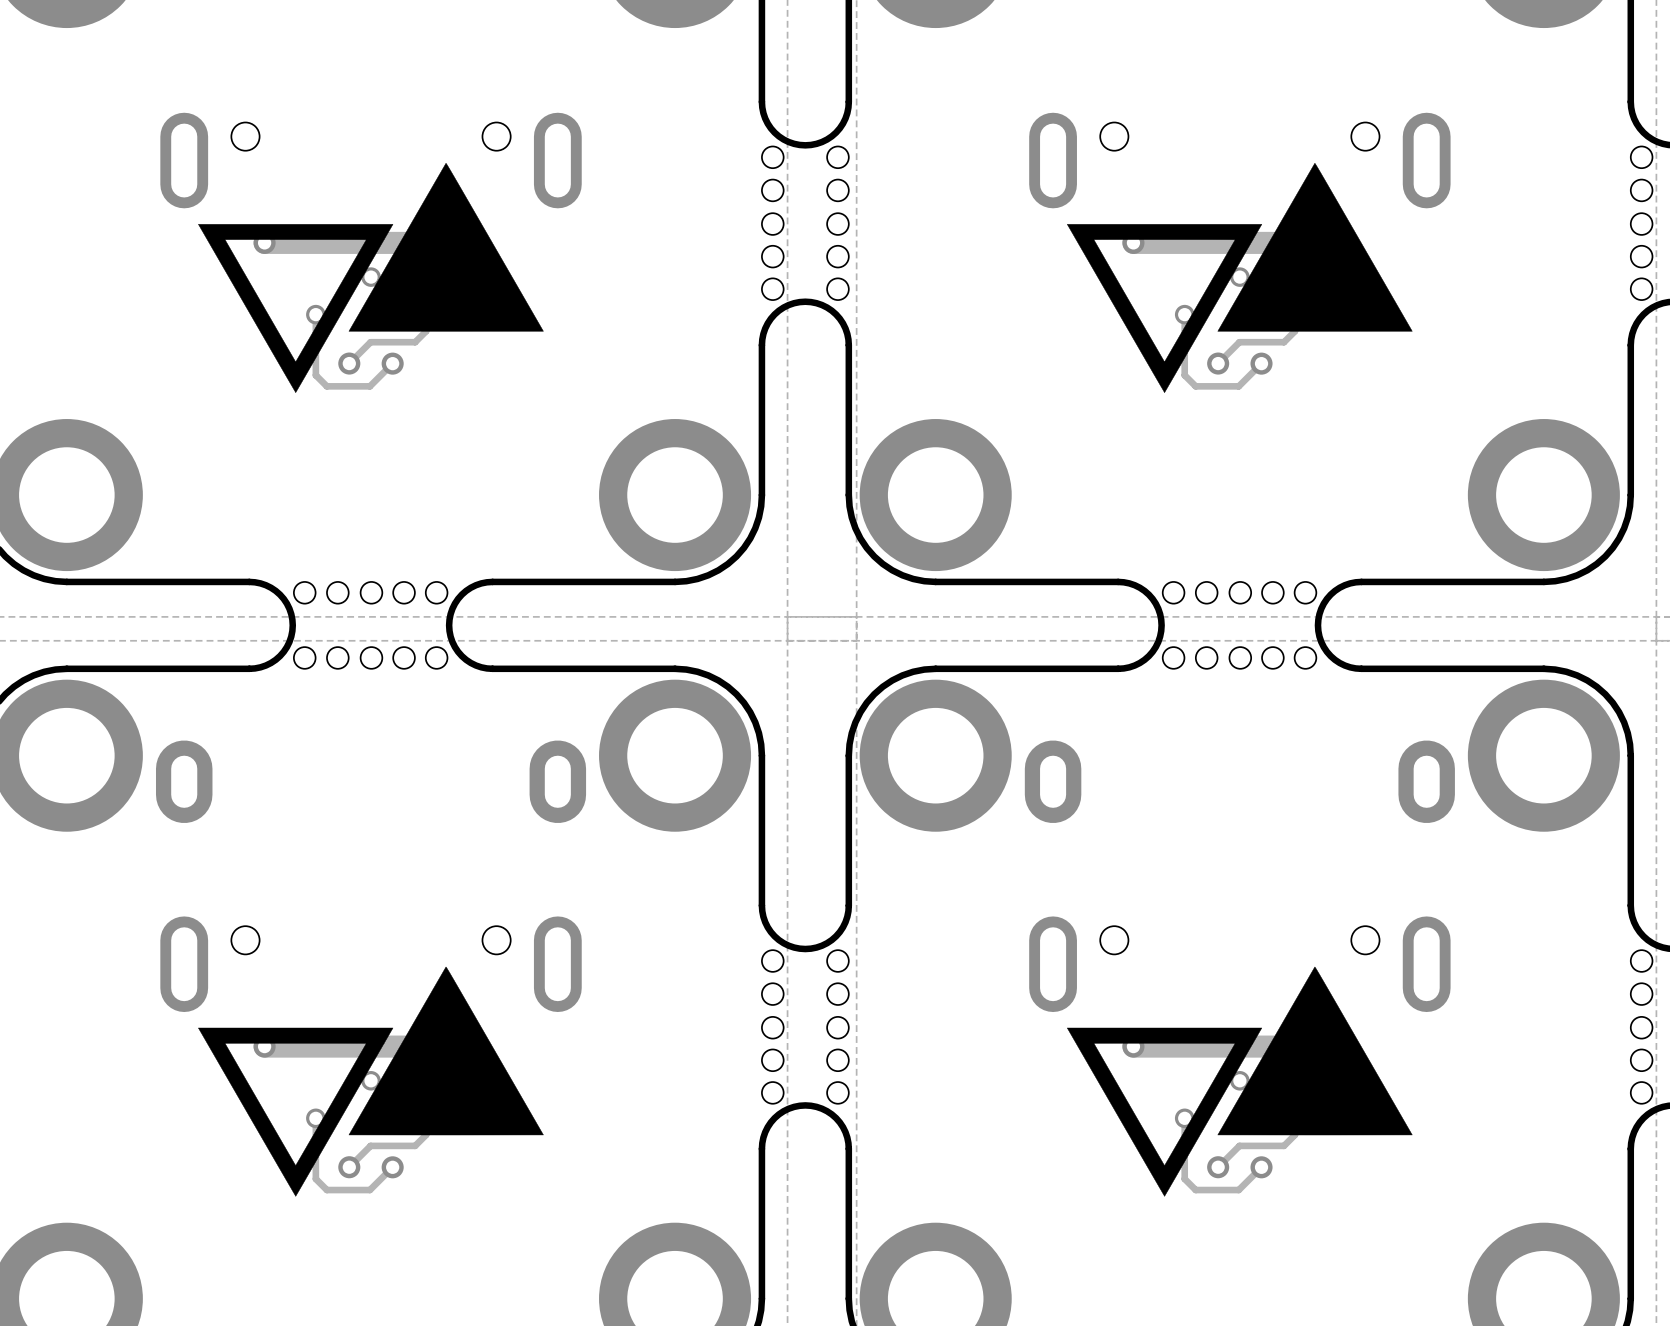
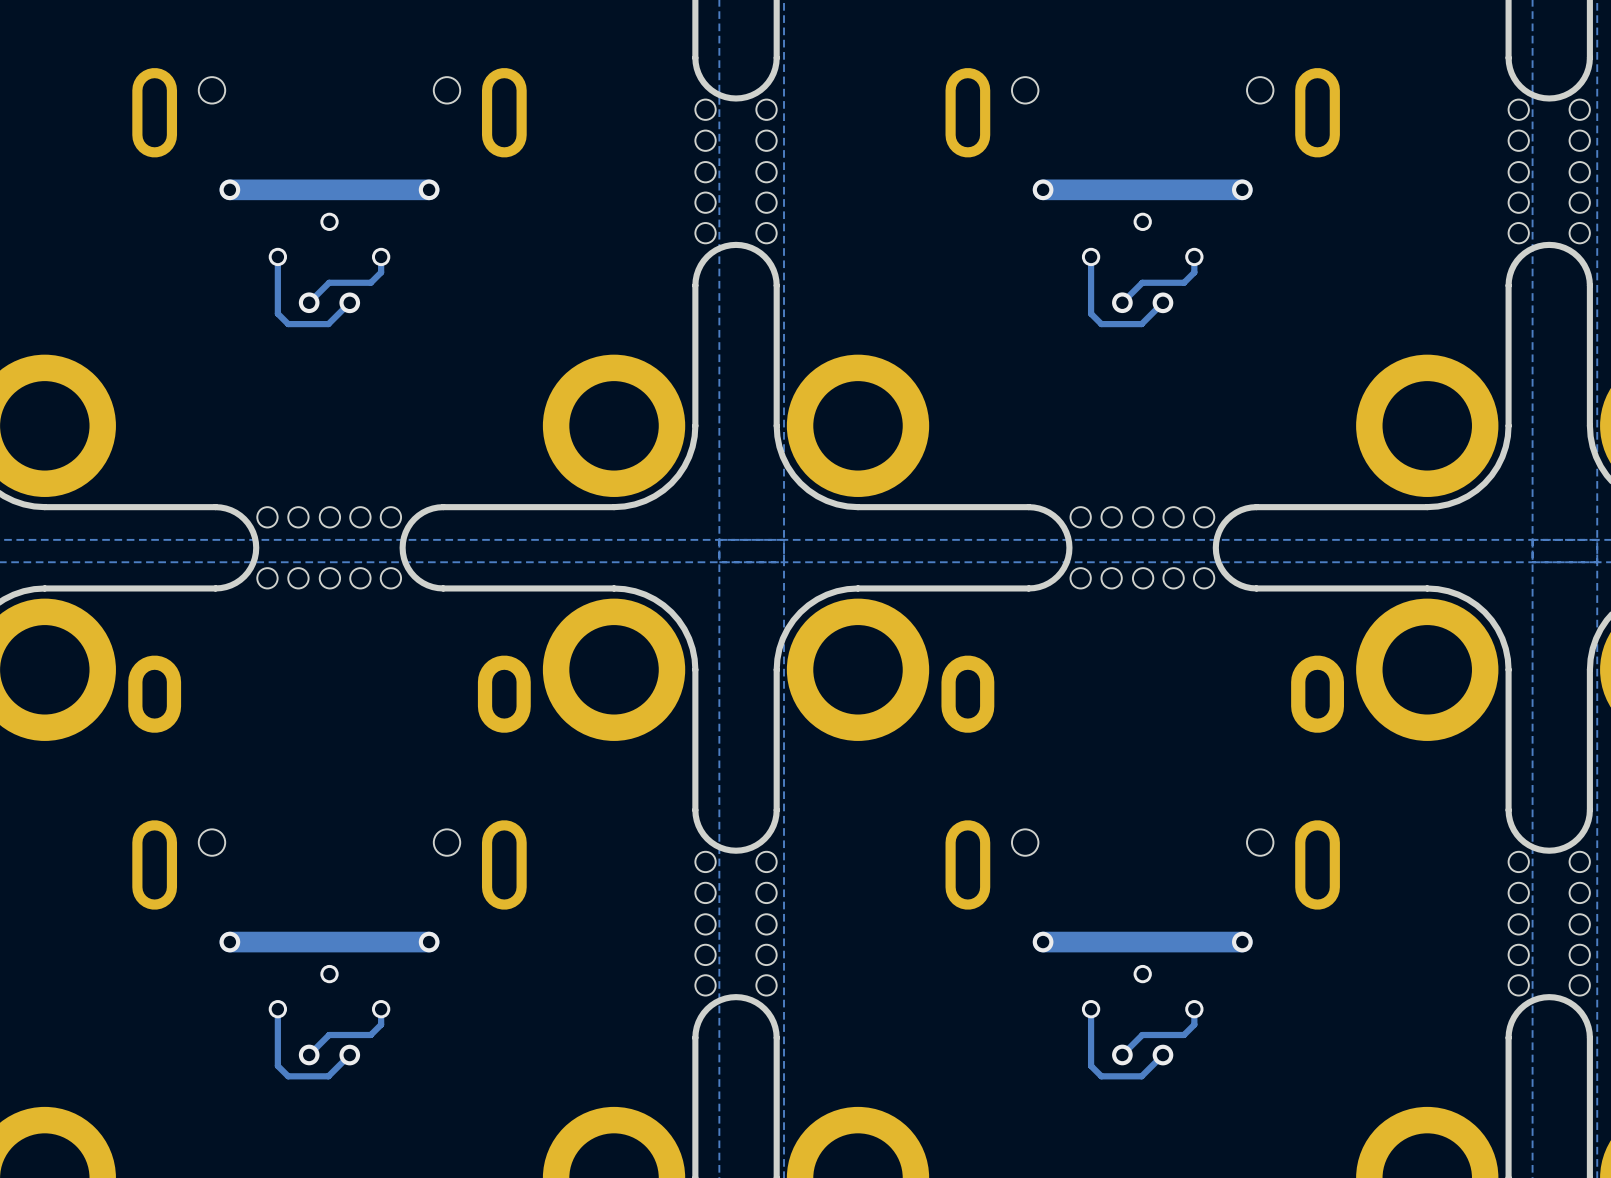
drawing: [198, 163, 544, 393] -> none
drawing: [1067, 163, 1413, 393] -> none
drawing: [198, 966, 544, 1197] -> none
drawing: [1067, 966, 1413, 1197] -> none

